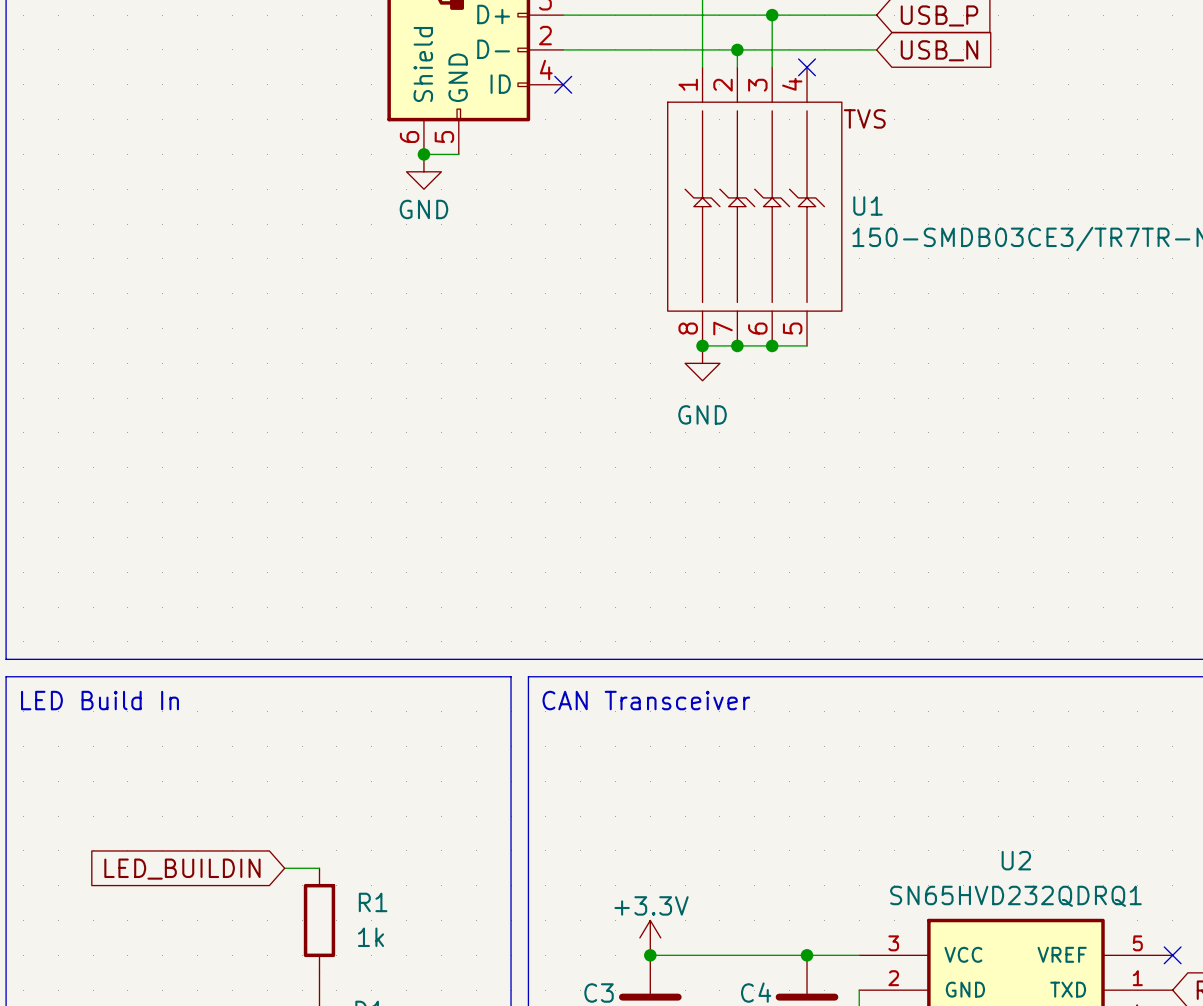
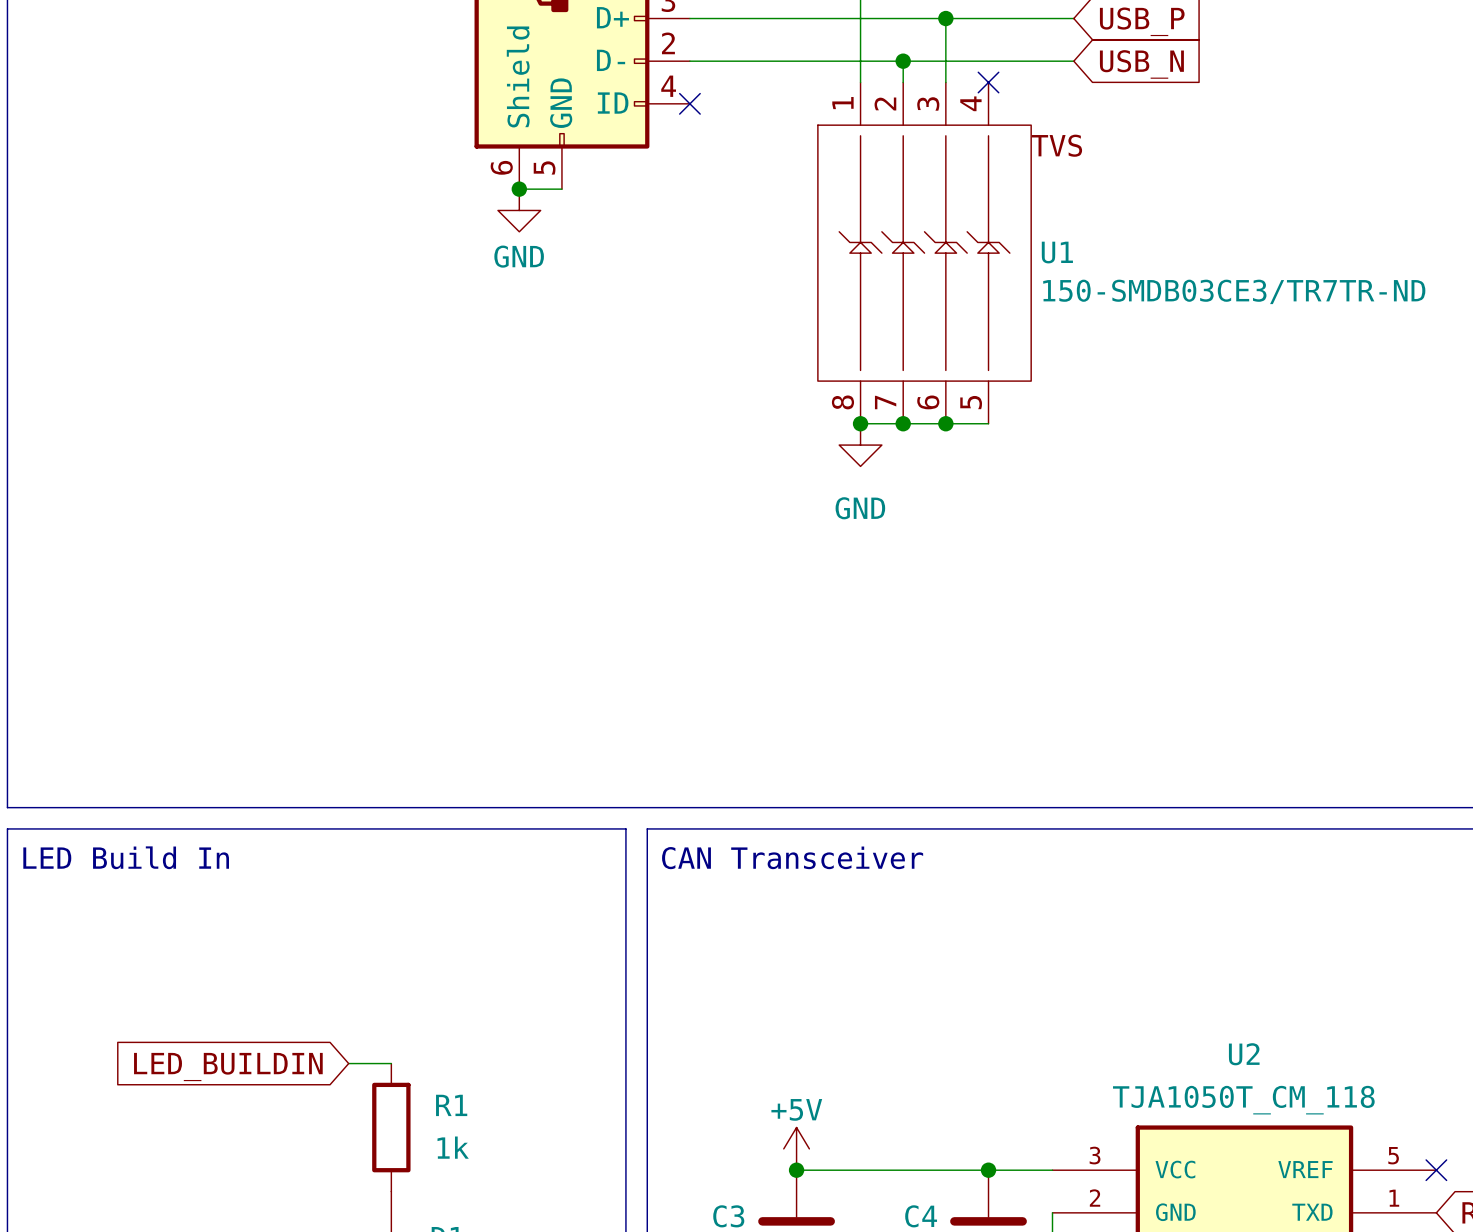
U2 value: SN65HVD232QDRQ1 (1015, 896) -> TJA1050T_CM_118 (1243, 1100)
power symbol: +3.3V (650, 937) -> +5V (796, 1148)

